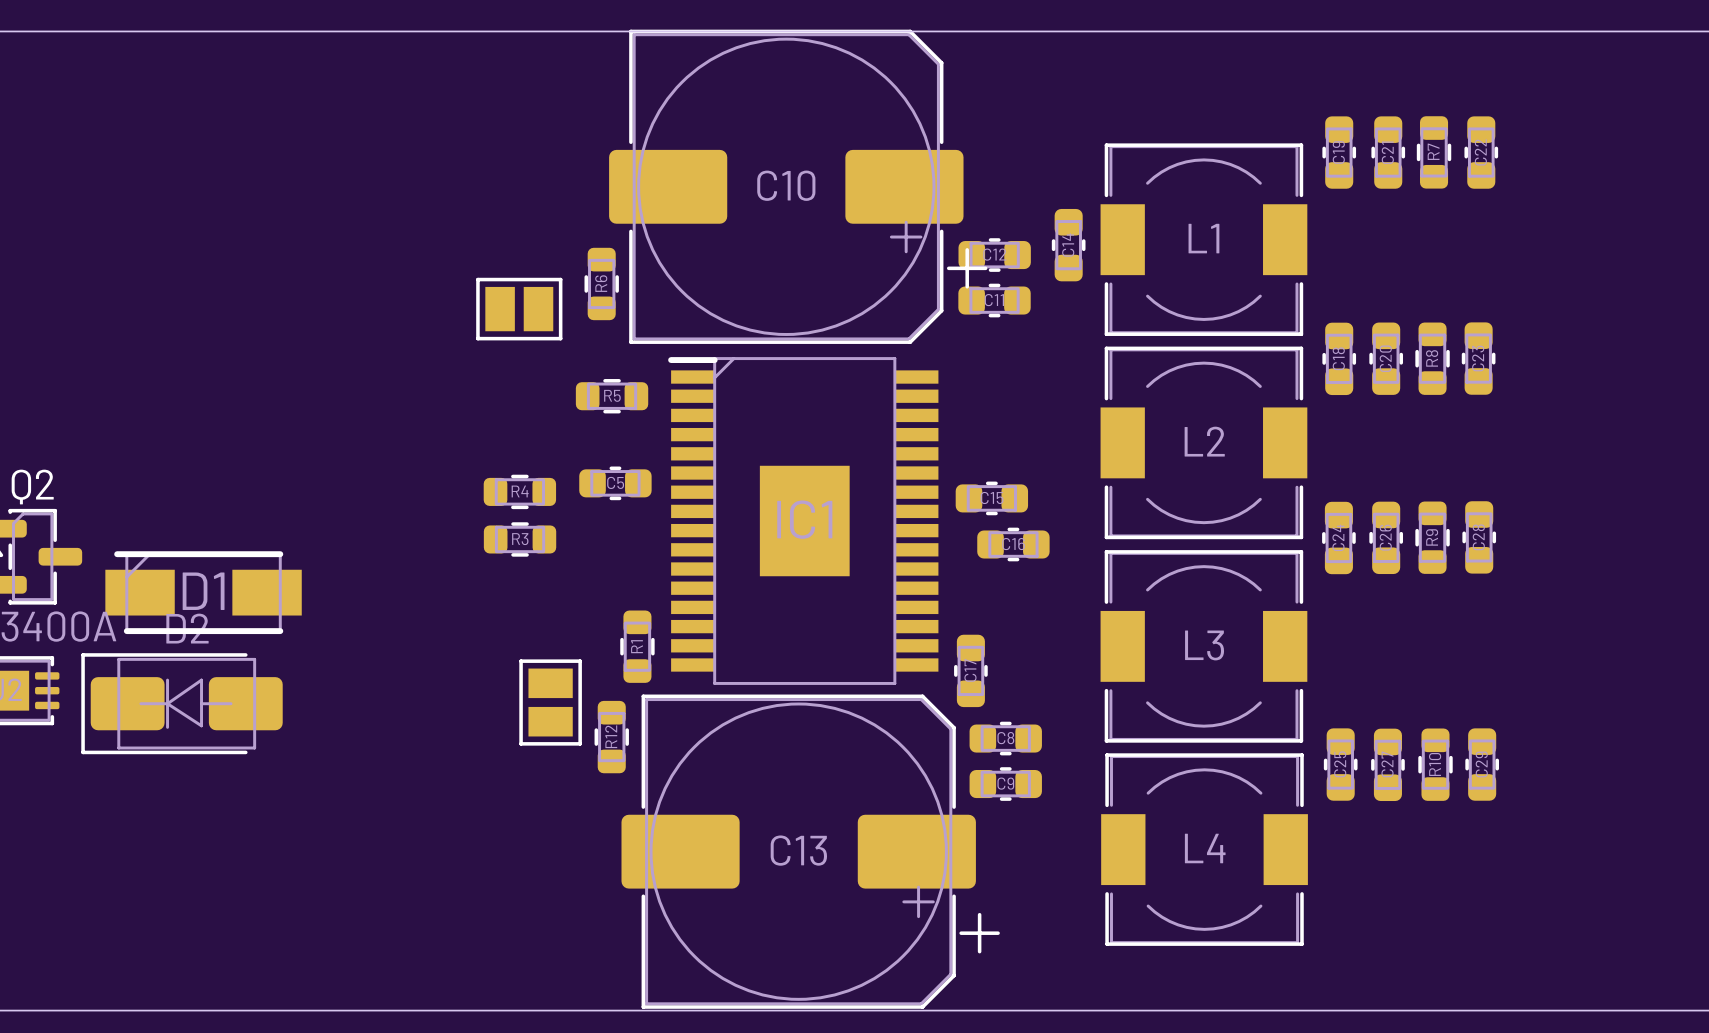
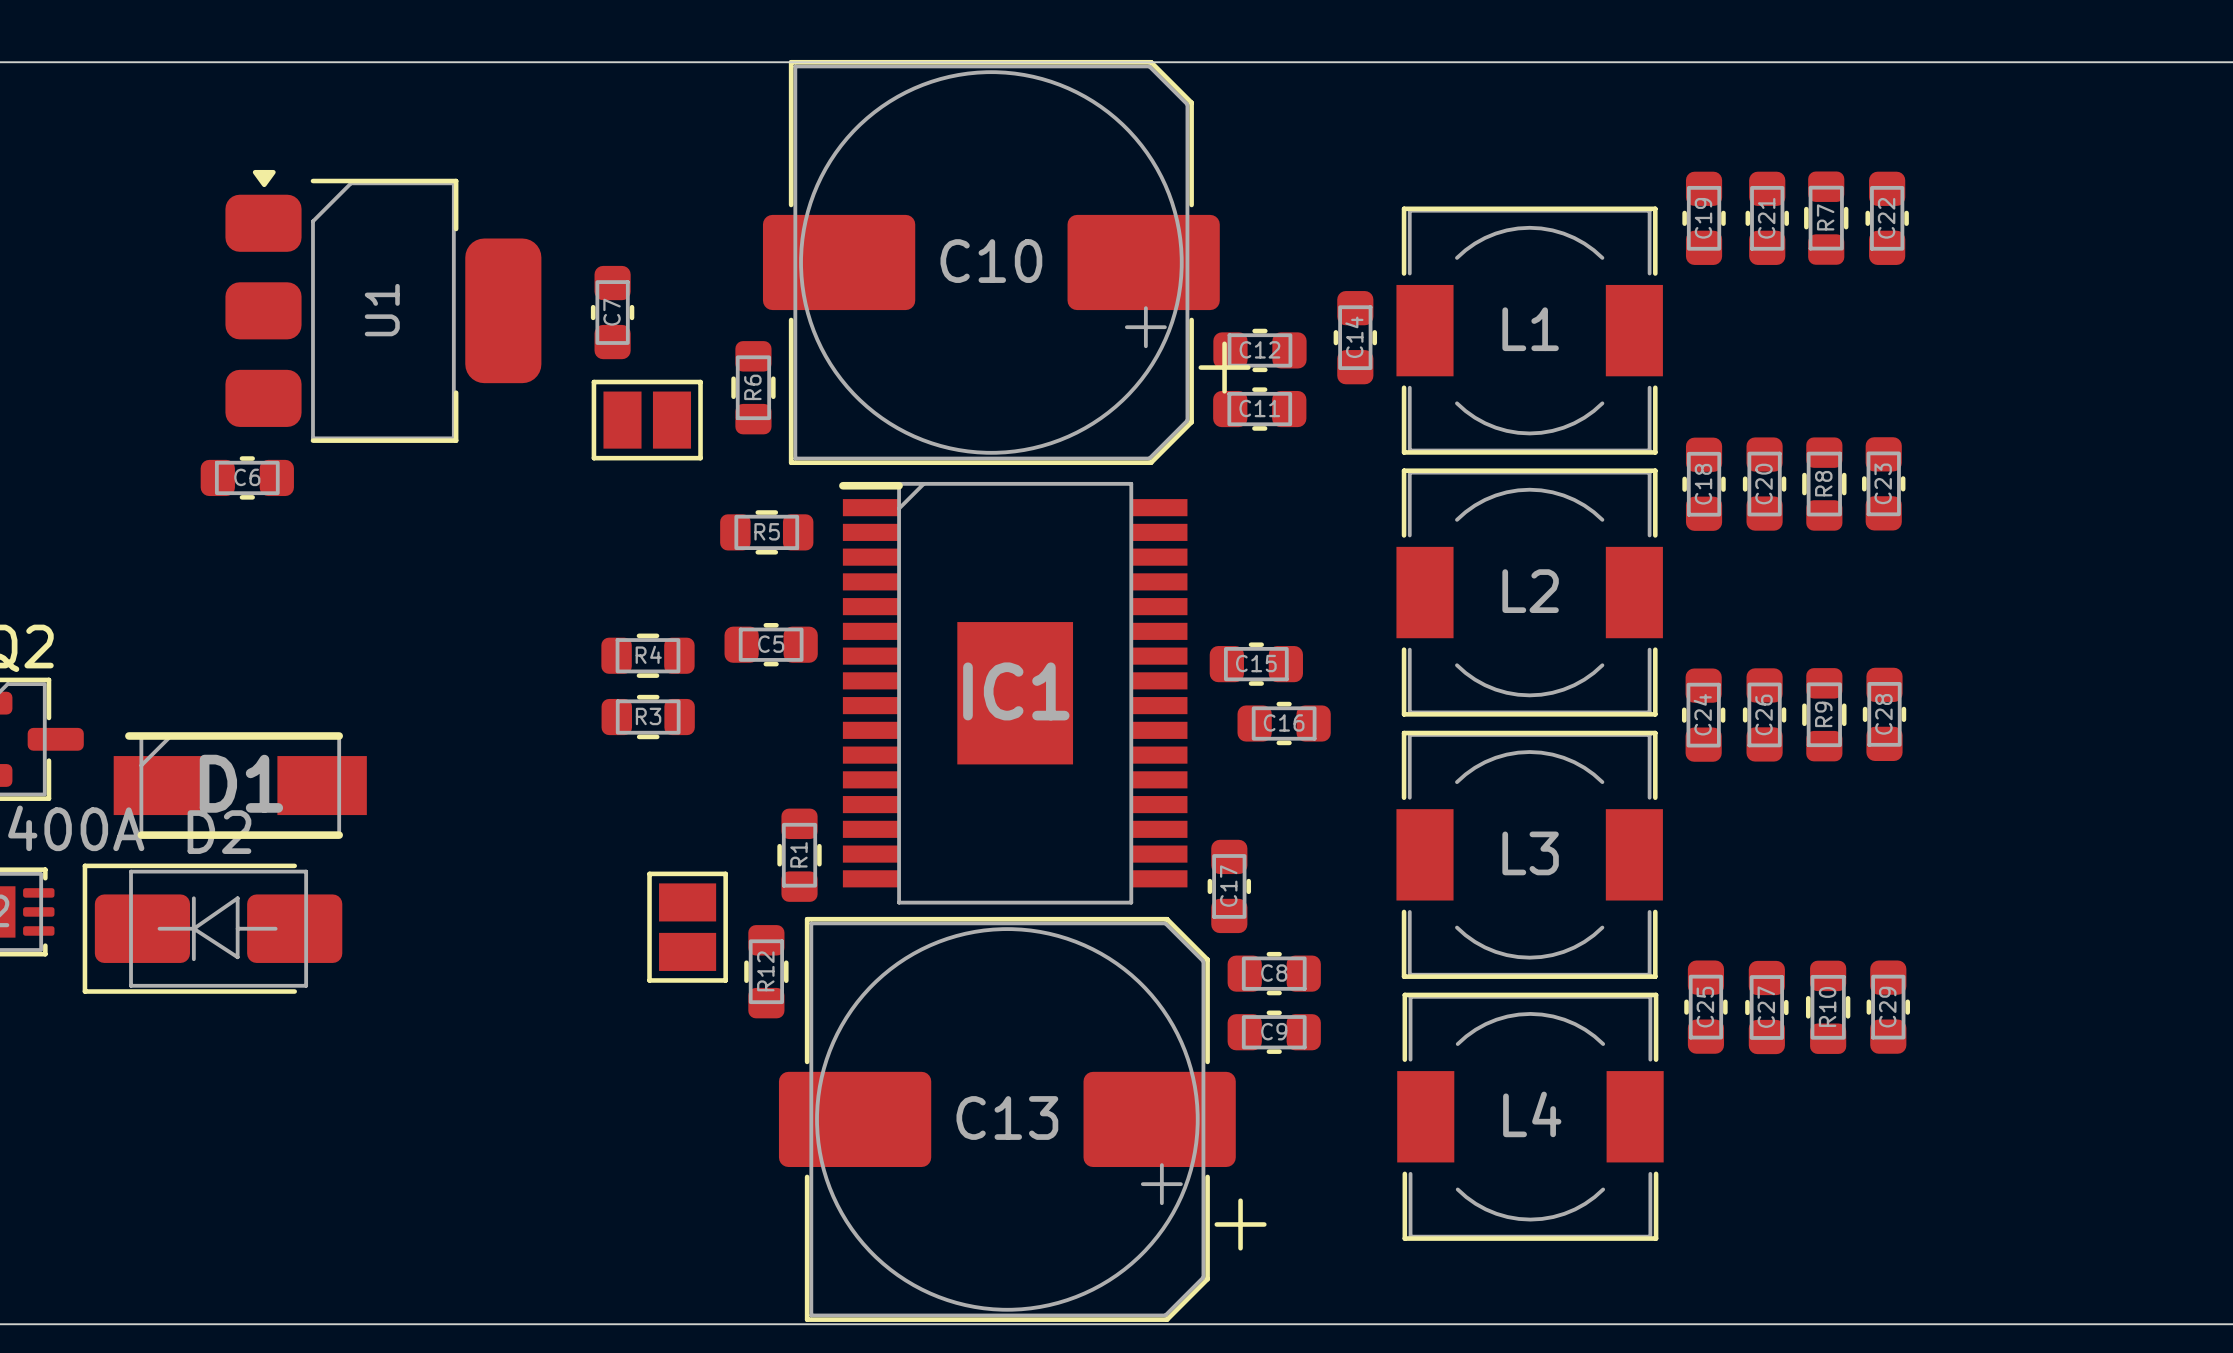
U1: none -> (383, 306)
C7: none -> (612, 312)
C6: none -> (247, 477)

